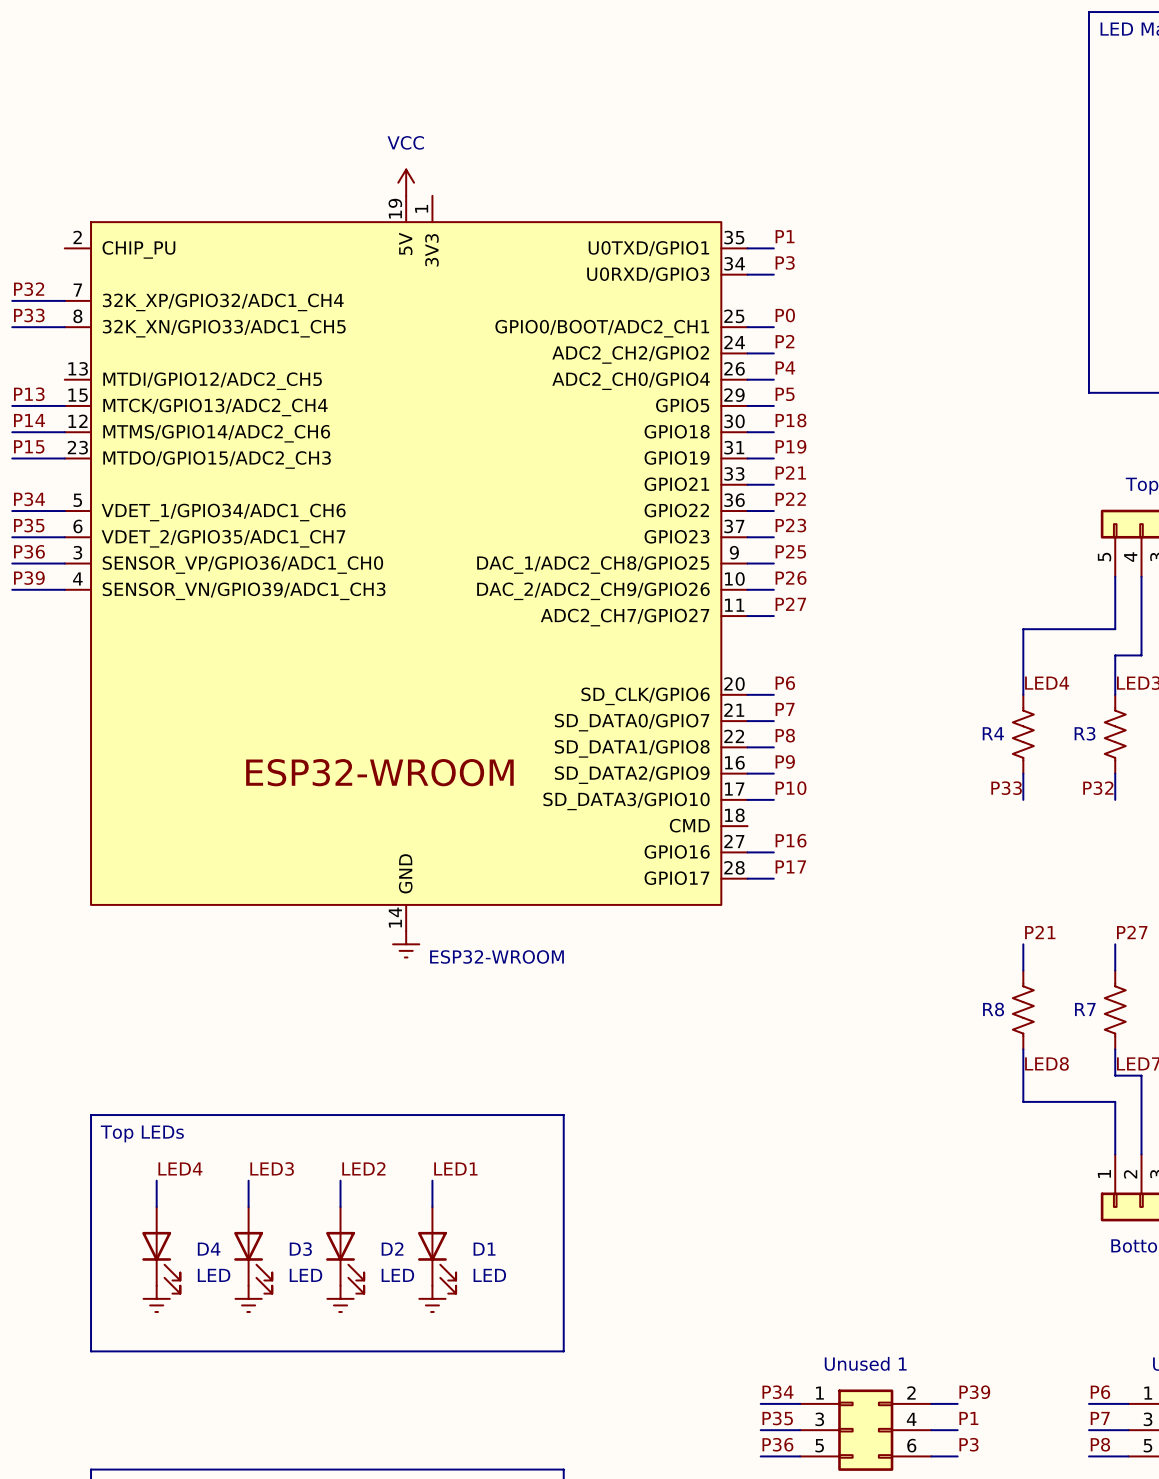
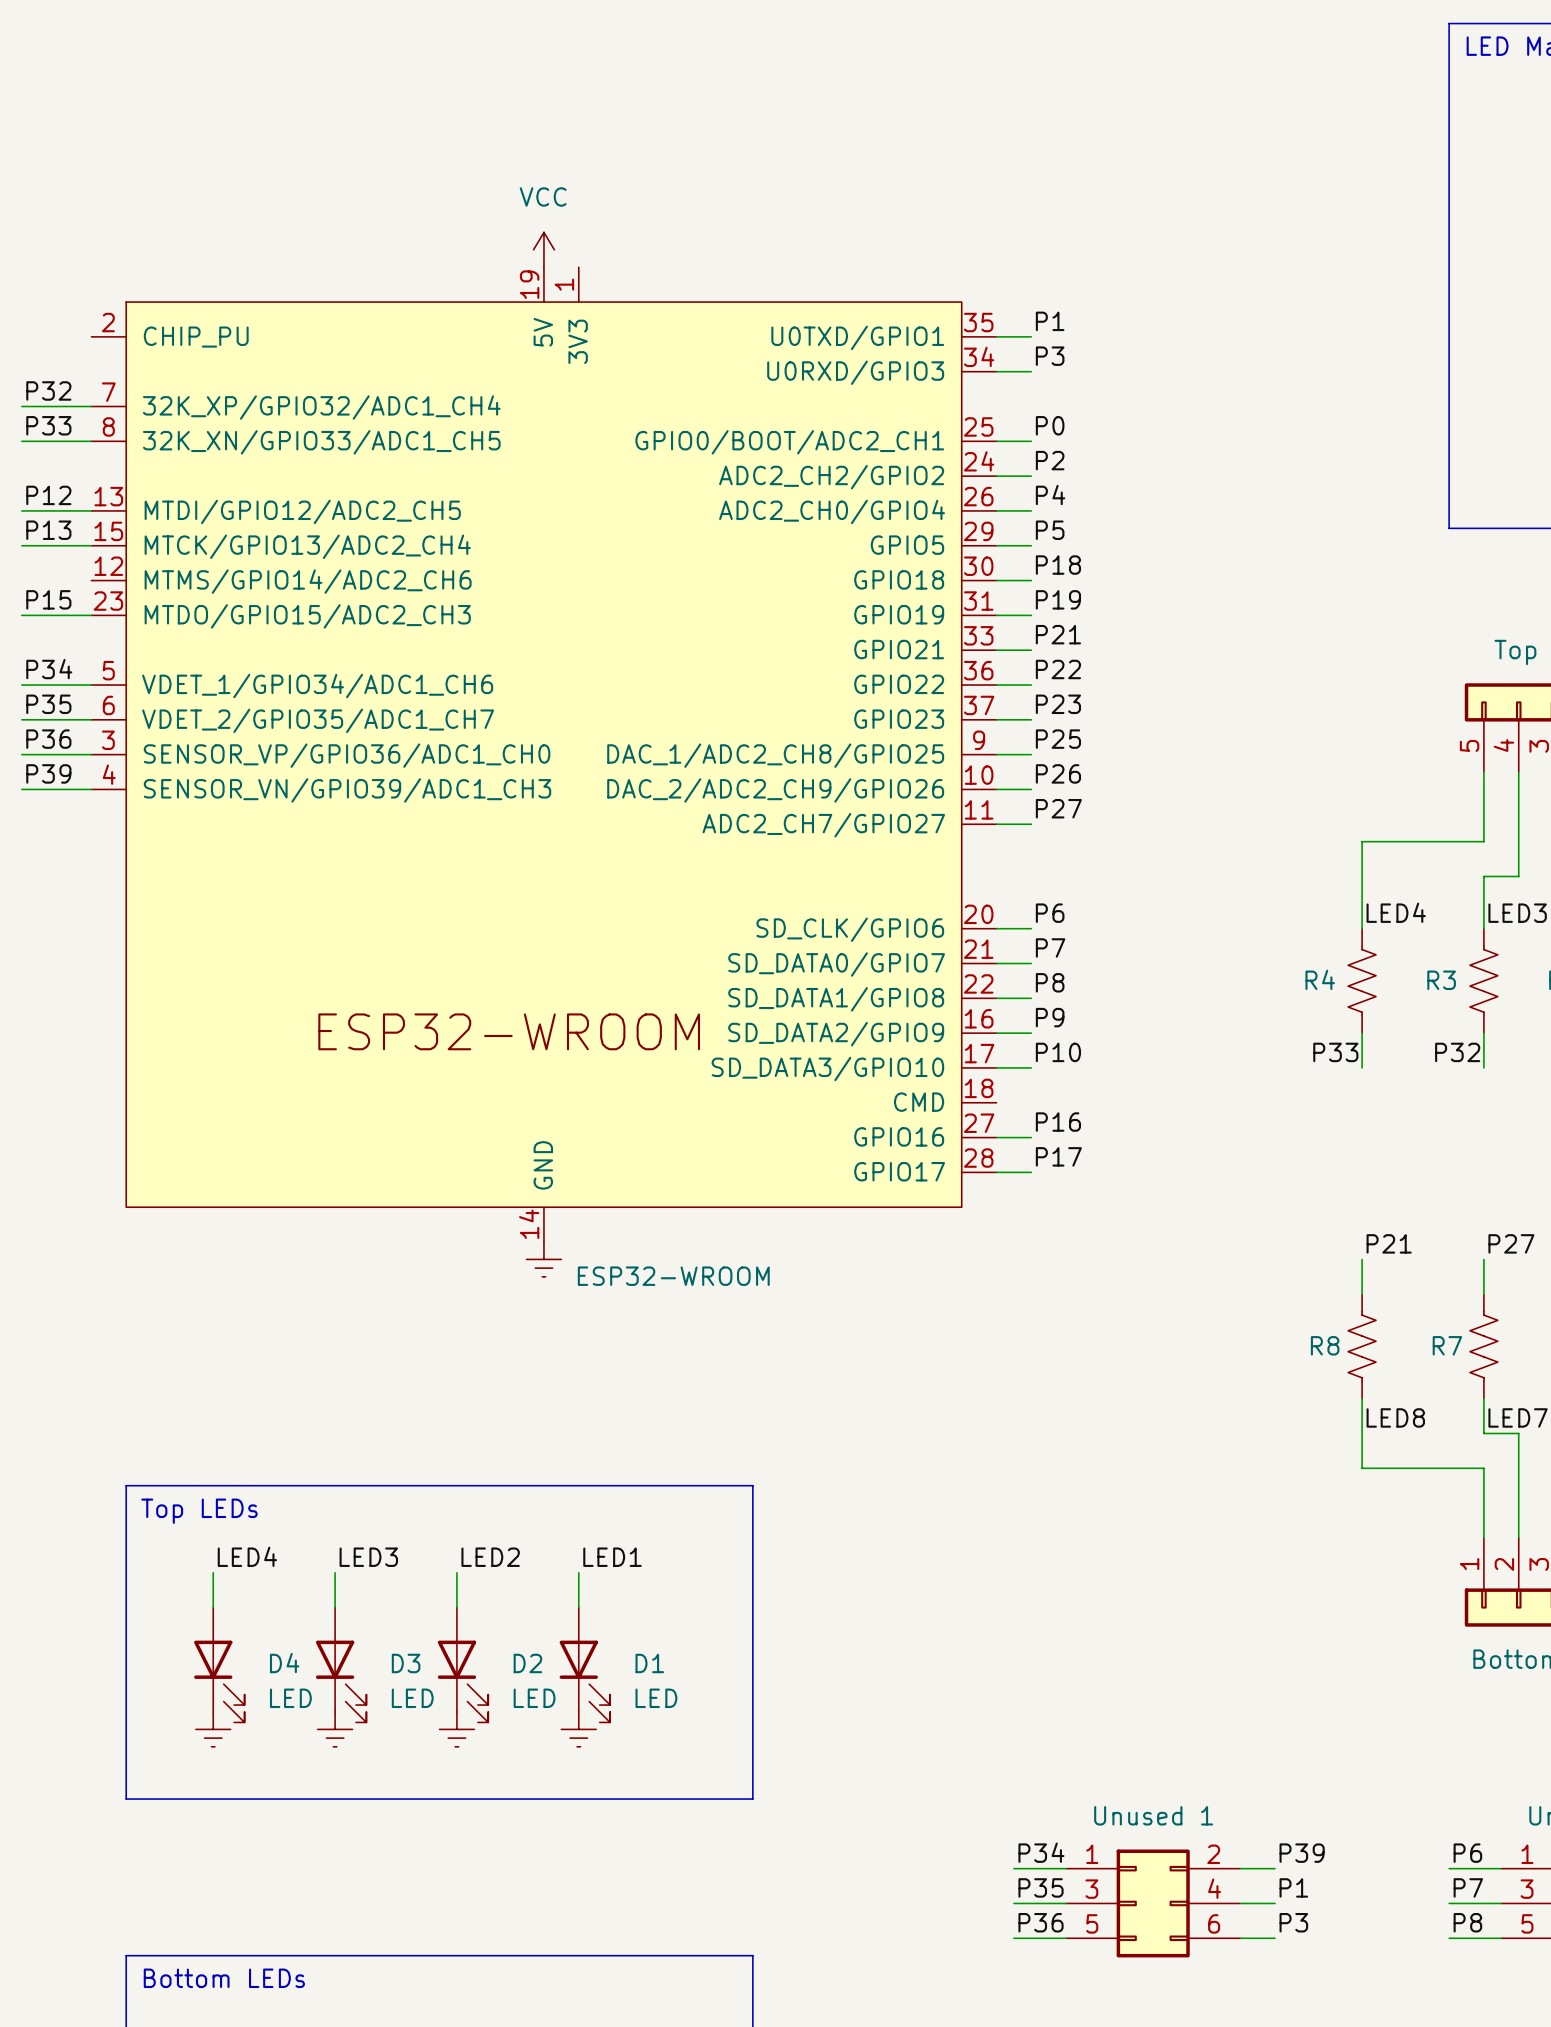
label: none -> P12 (48, 495)
label: P14 (29, 420) -> none
wire: (12, 432) (64, 432) -> (21, 510) (91, 510)

